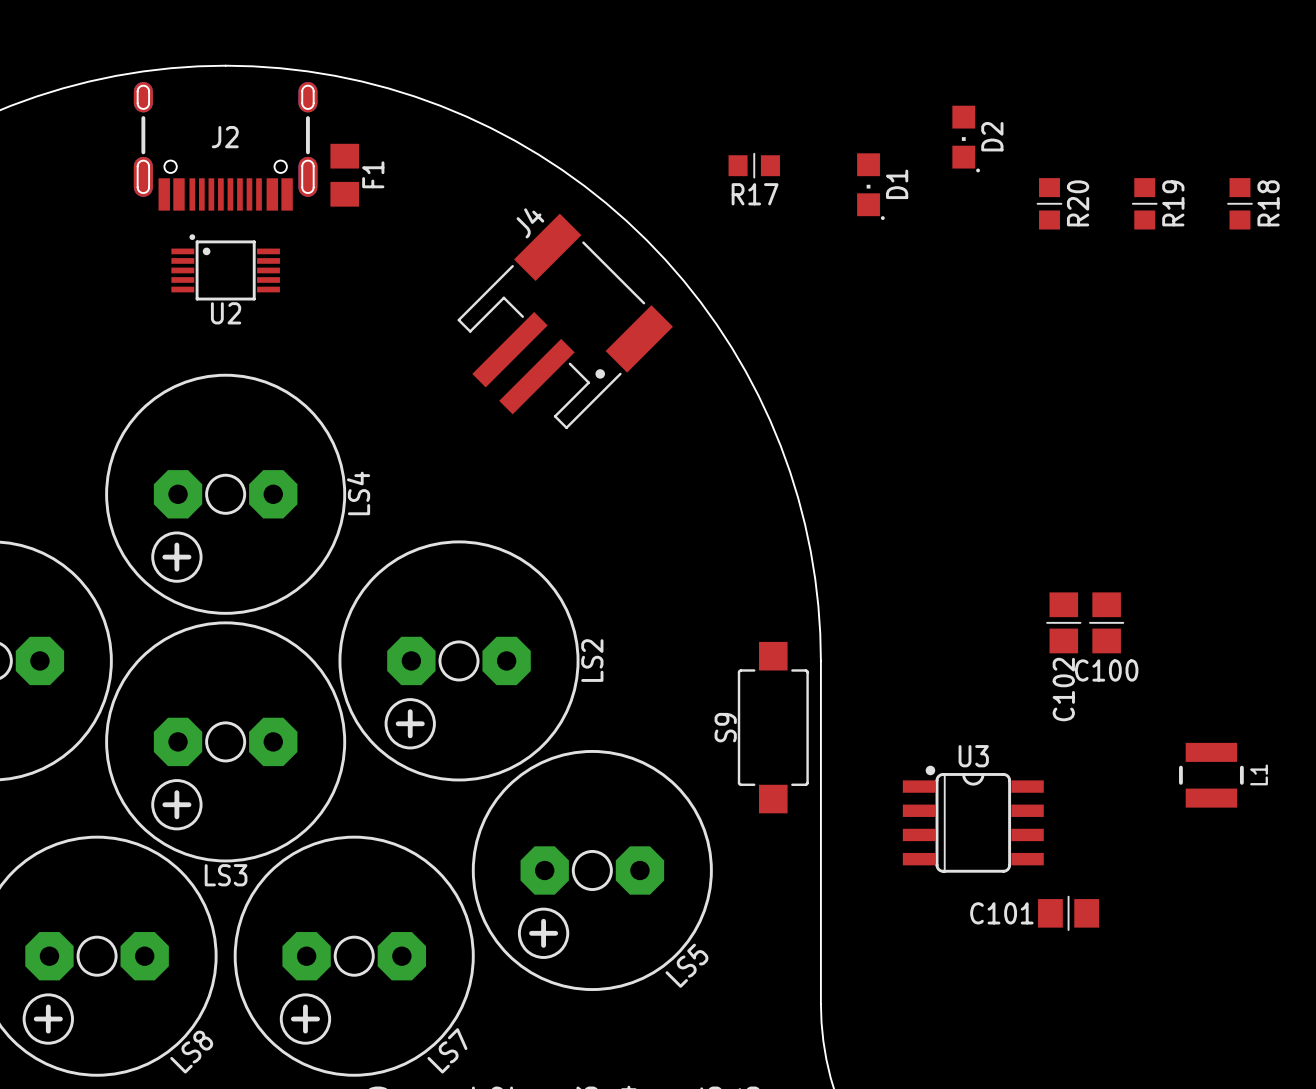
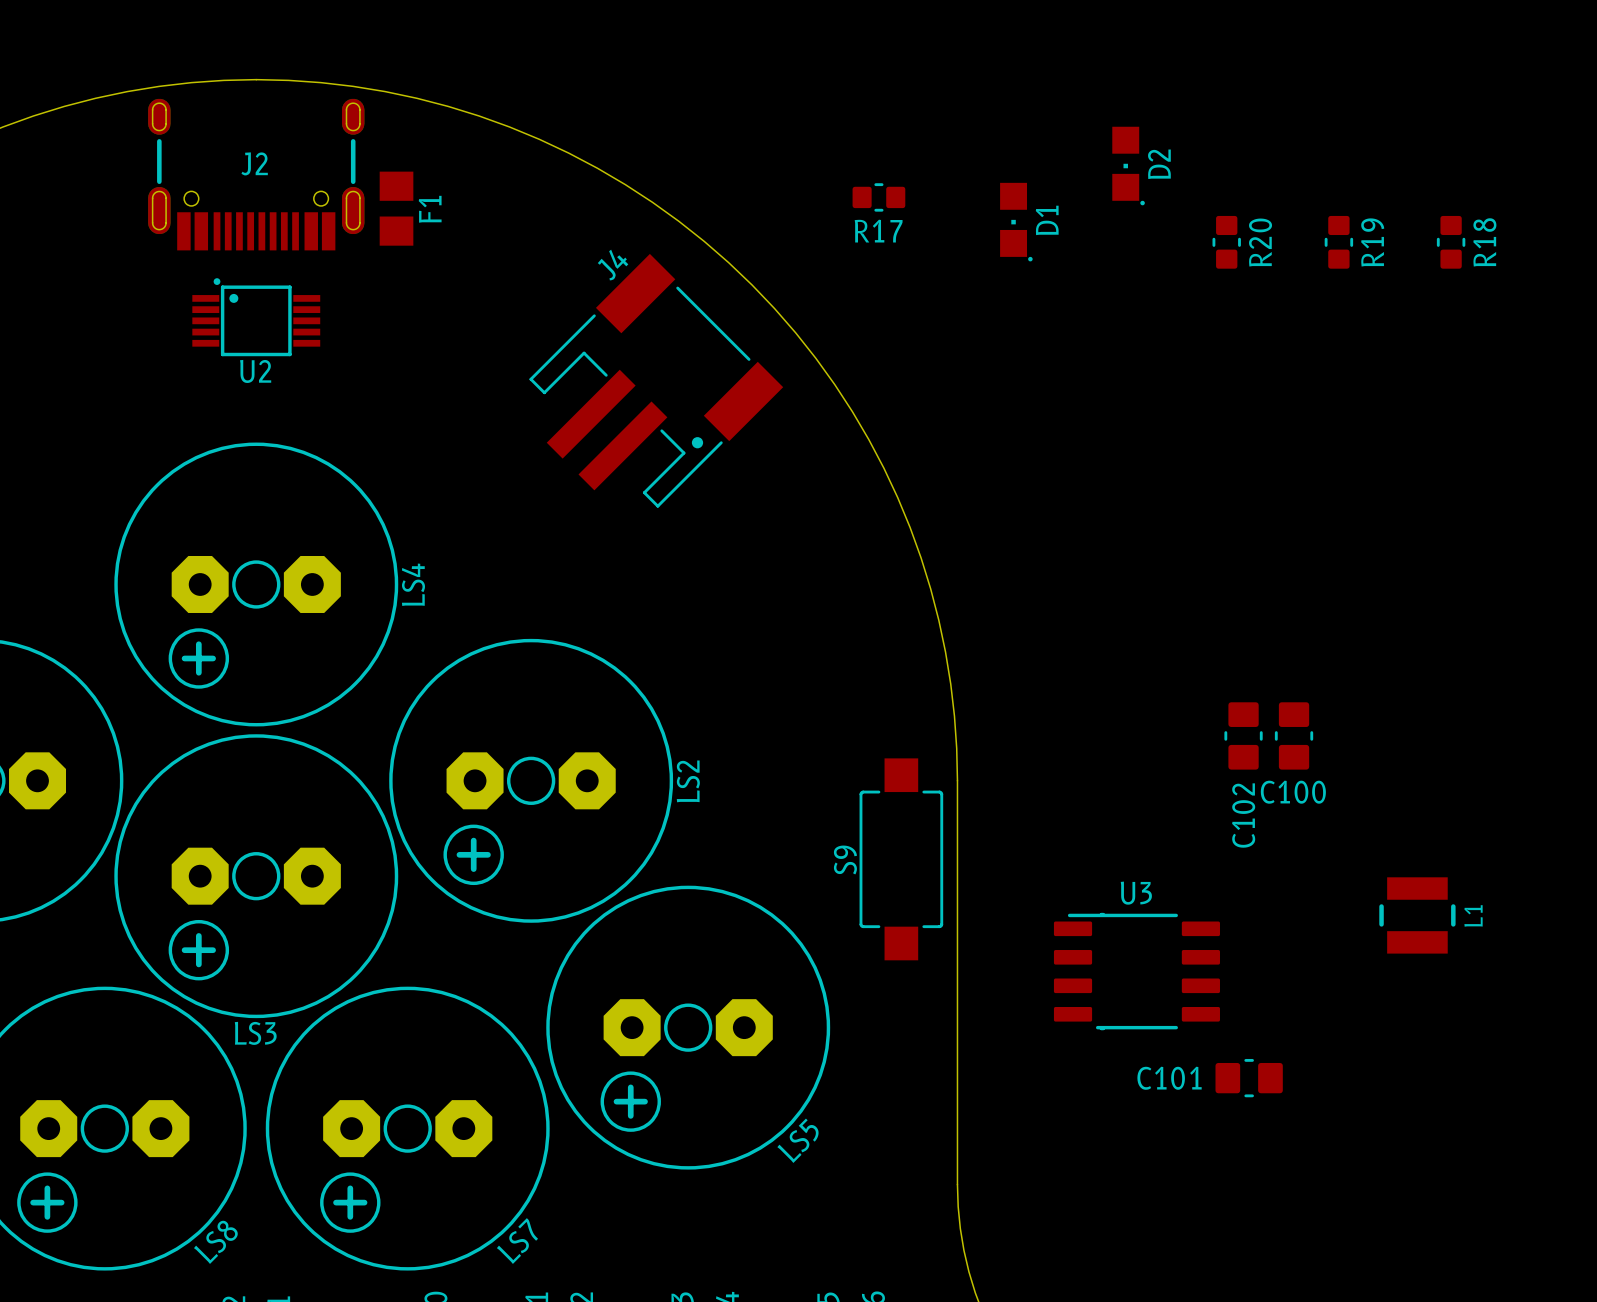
R17 footprint: [728, 152, 780, 179] -> [852, 183, 906, 212]
R20 footprint: [1036, 178, 1063, 230] -> [1212, 215, 1241, 269]
R19 footprint: [1131, 178, 1158, 230] -> [1324, 215, 1354, 269]
R18 footprint: [1227, 178, 1253, 230] -> [1436, 215, 1466, 269]
C102 footprint: [1046, 592, 1082, 654] -> [1224, 702, 1263, 770]
C100 footprint: [1089, 592, 1125, 654] -> [1274, 702, 1314, 770]
U3 footprint: [902, 765, 1044, 873] -> [1053, 912, 1220, 1031]
C101 footprint: [1038, 895, 1100, 931] -> [1215, 1058, 1283, 1098]

